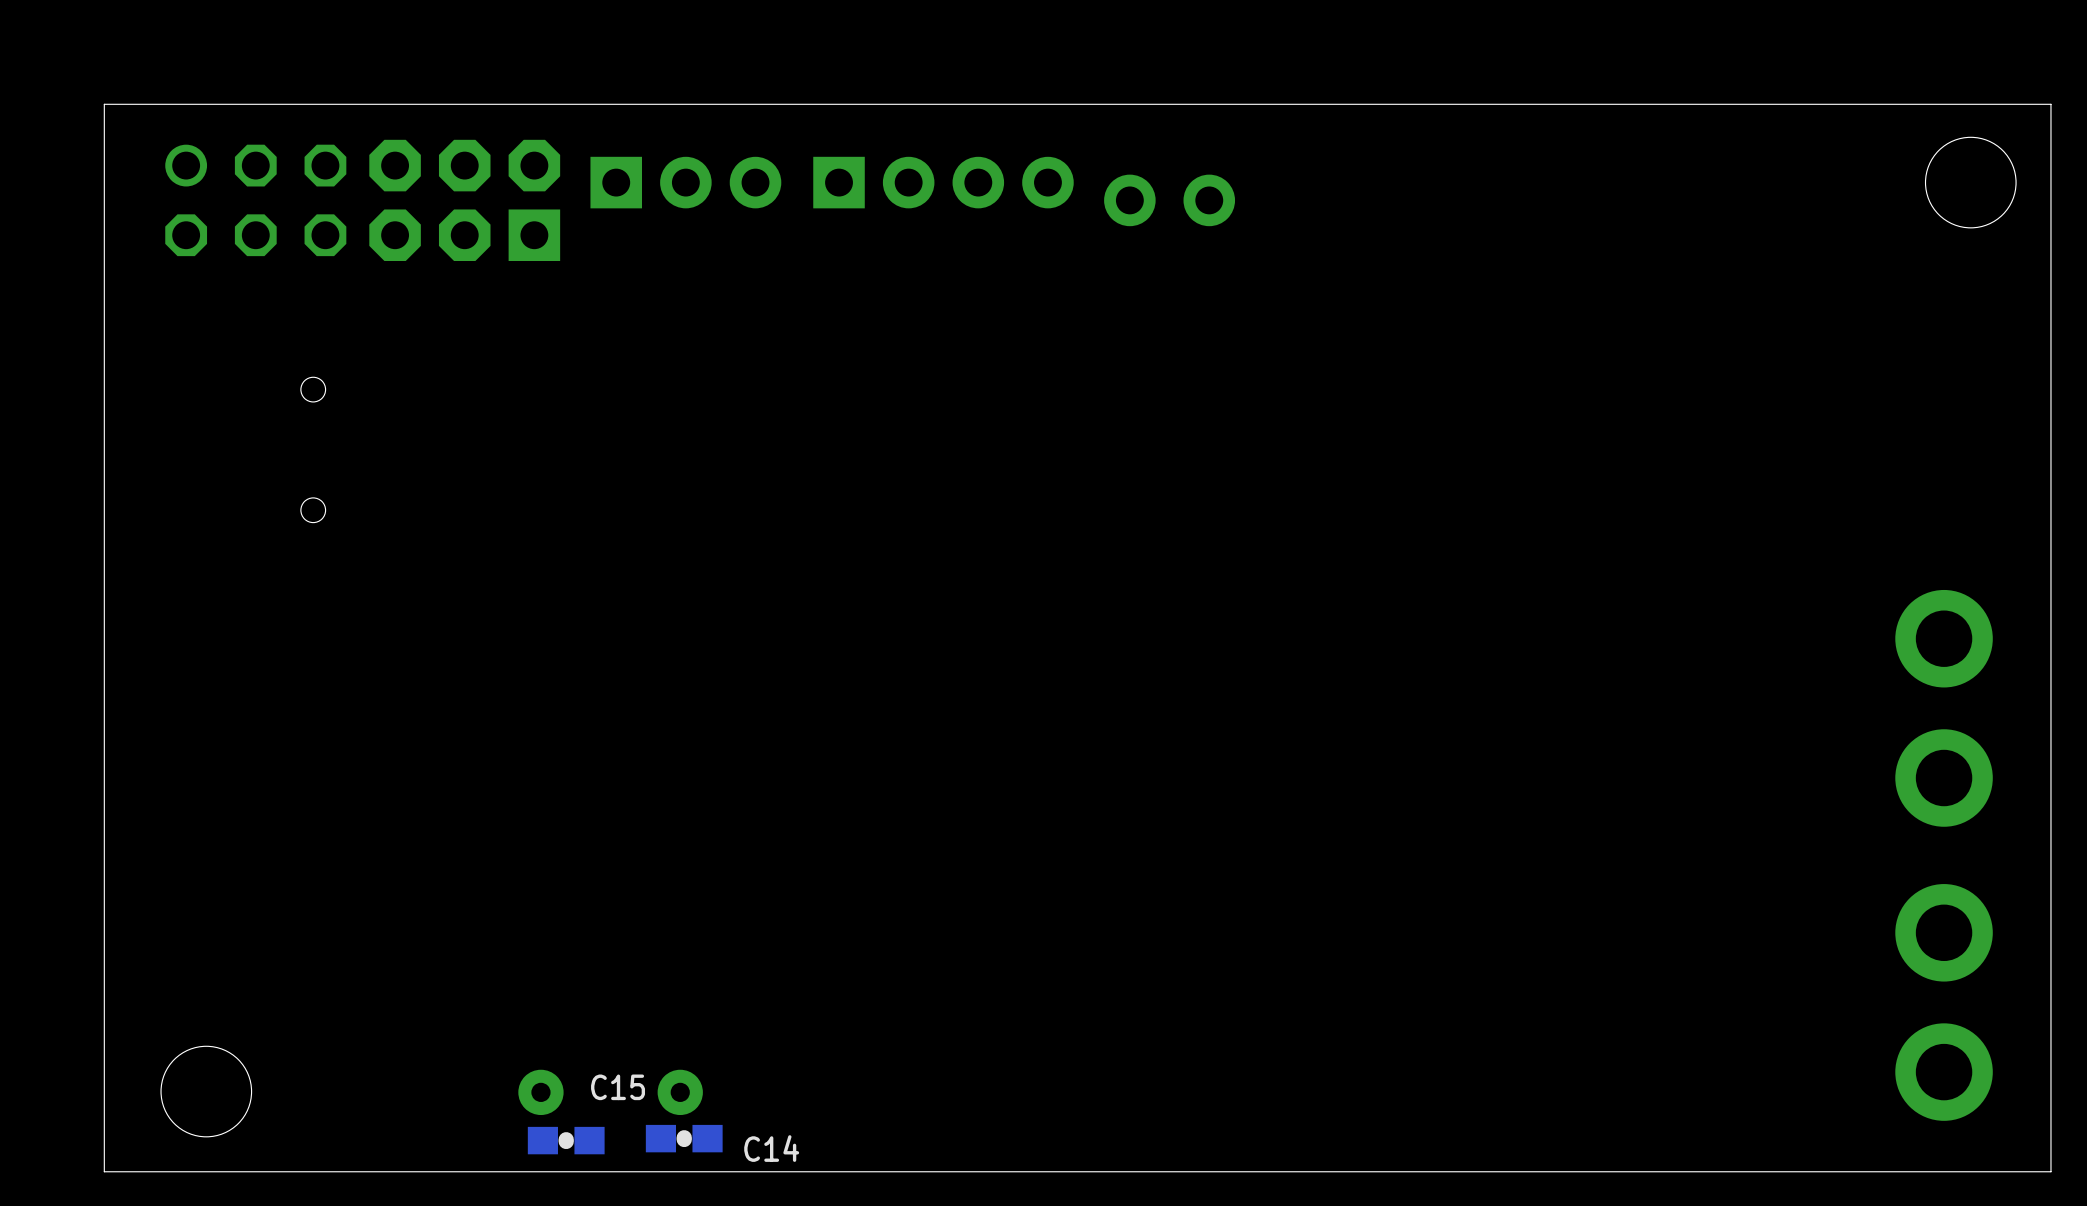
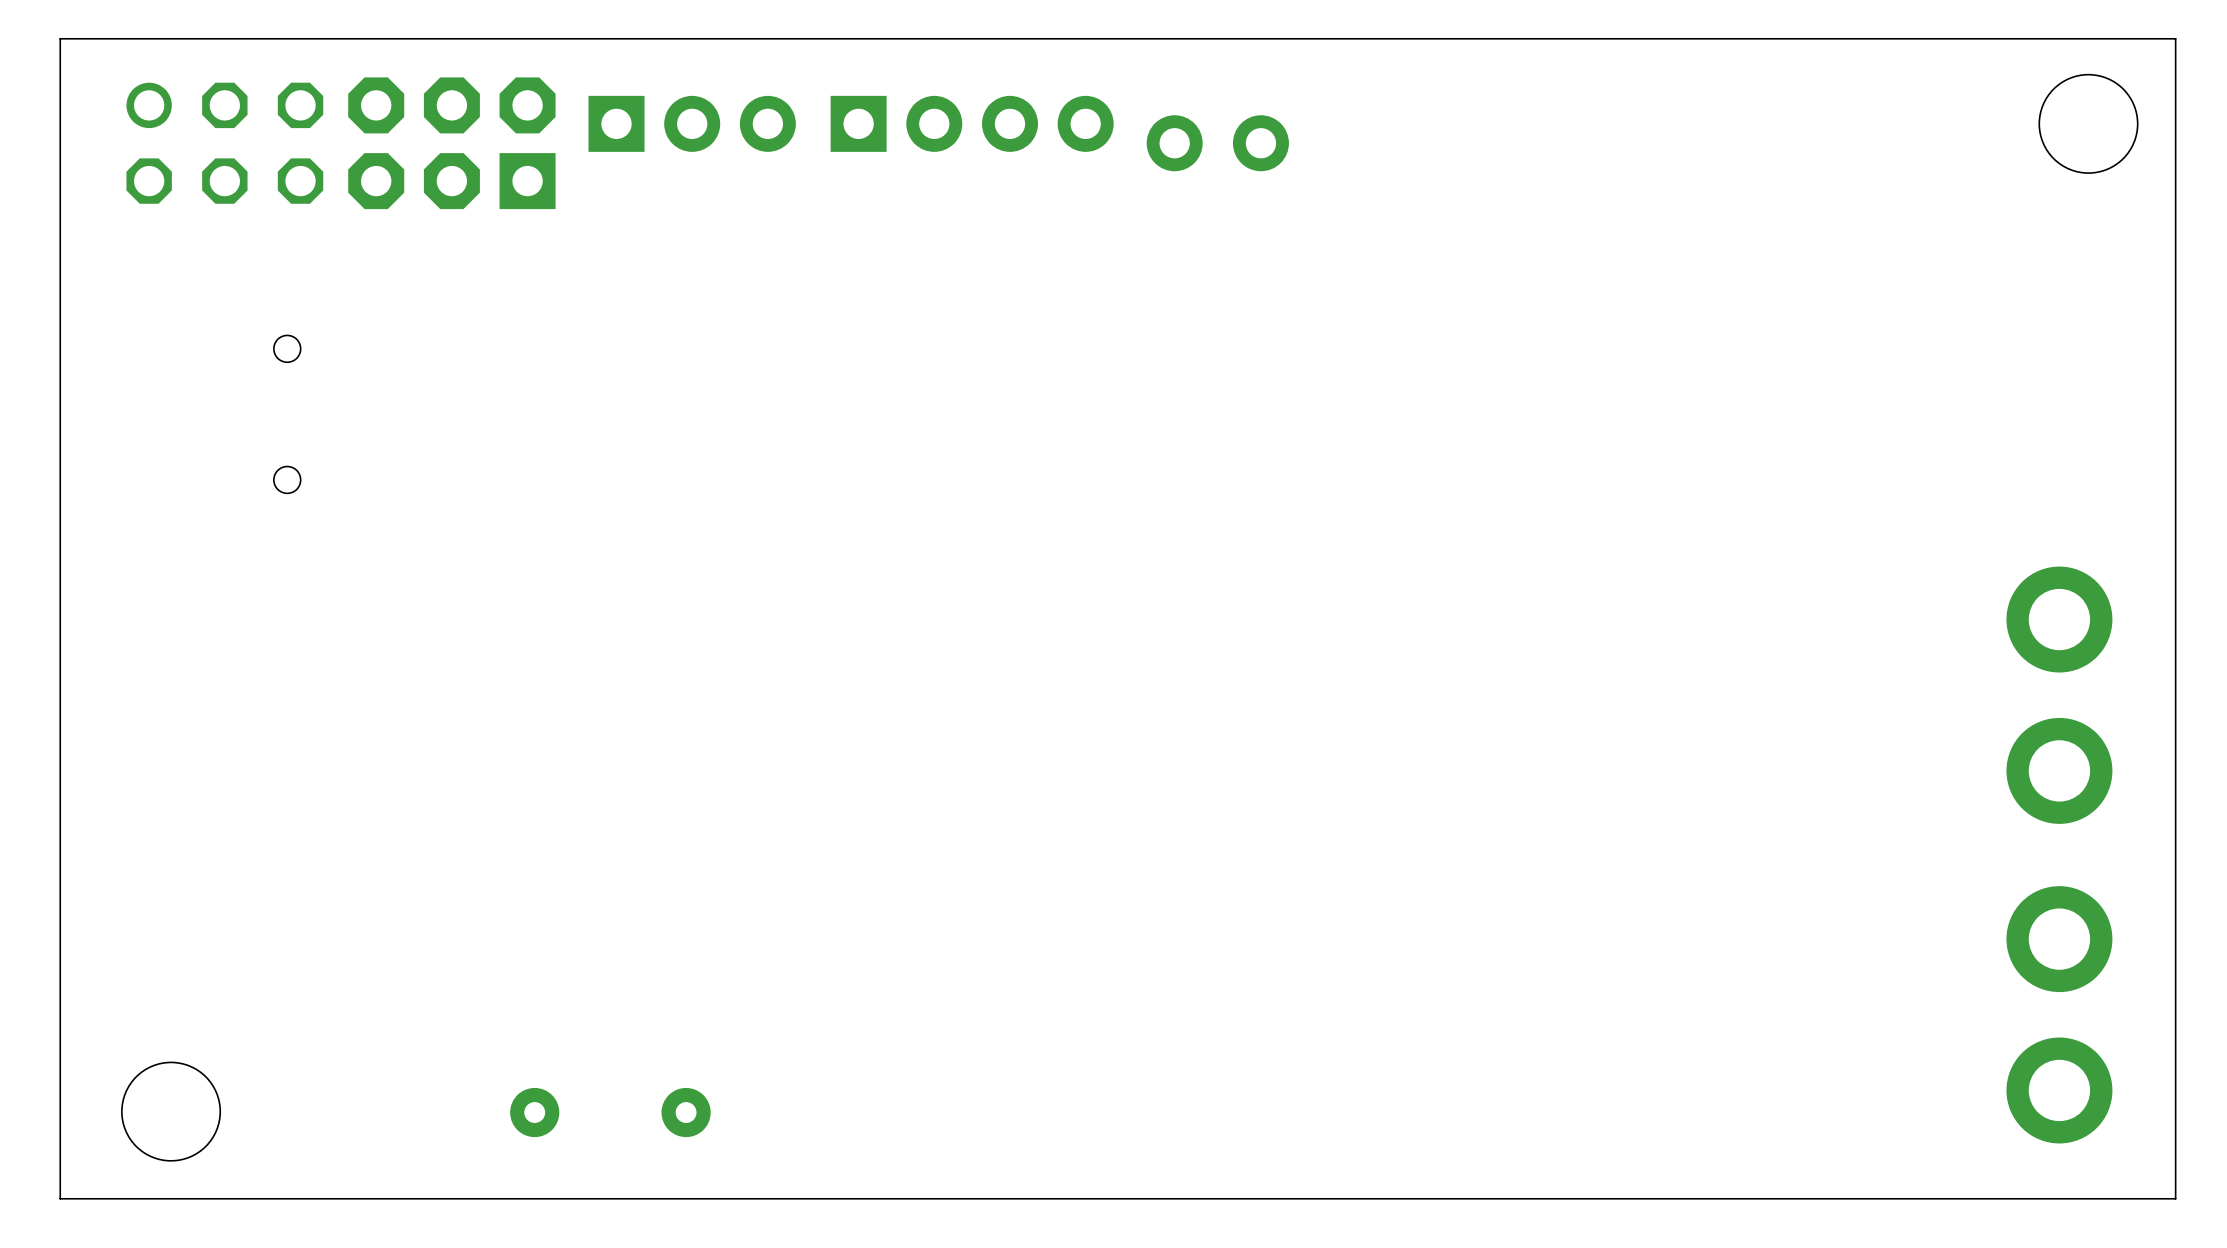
C14: (684, 1138) -> none
C15: (566, 1140) -> none

